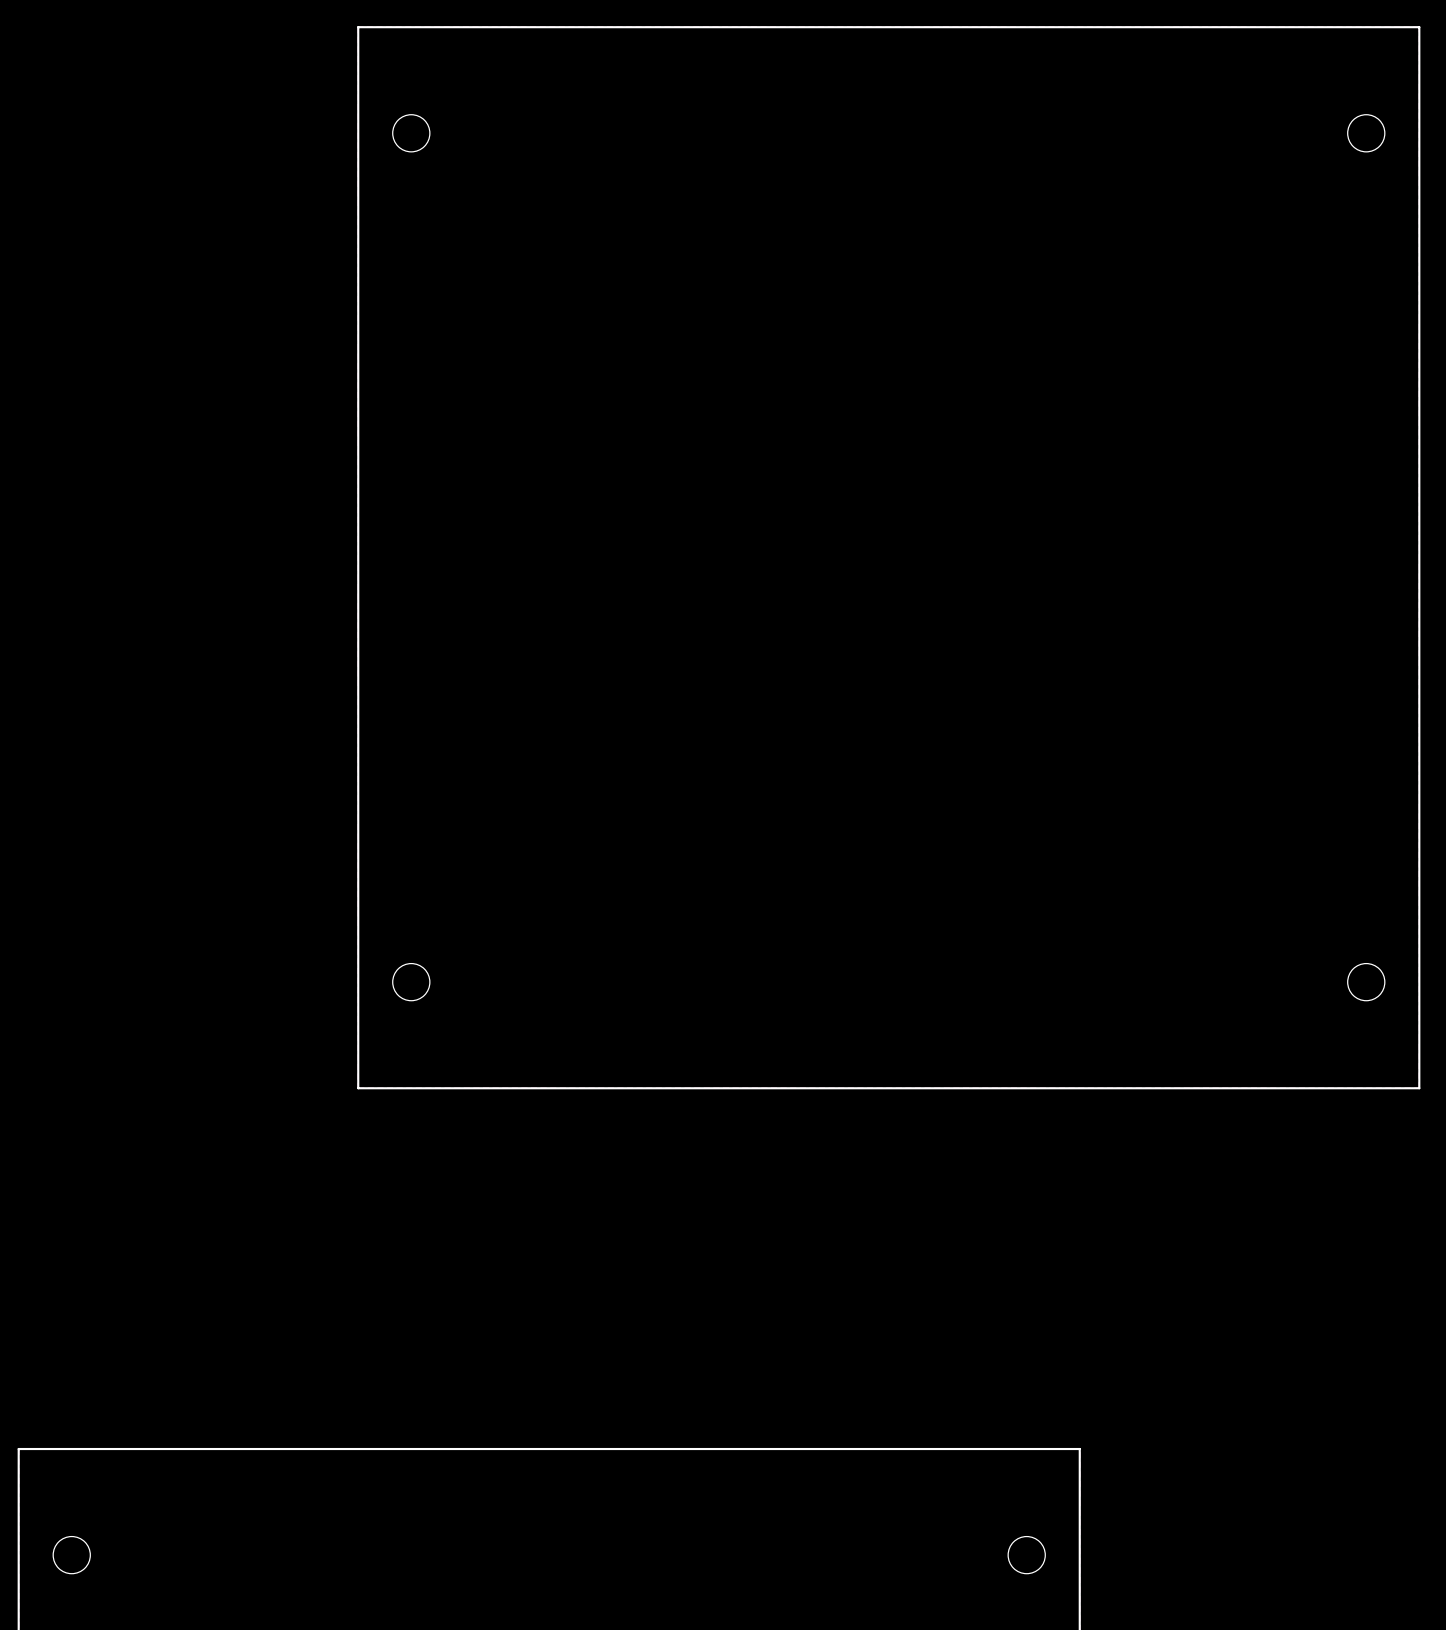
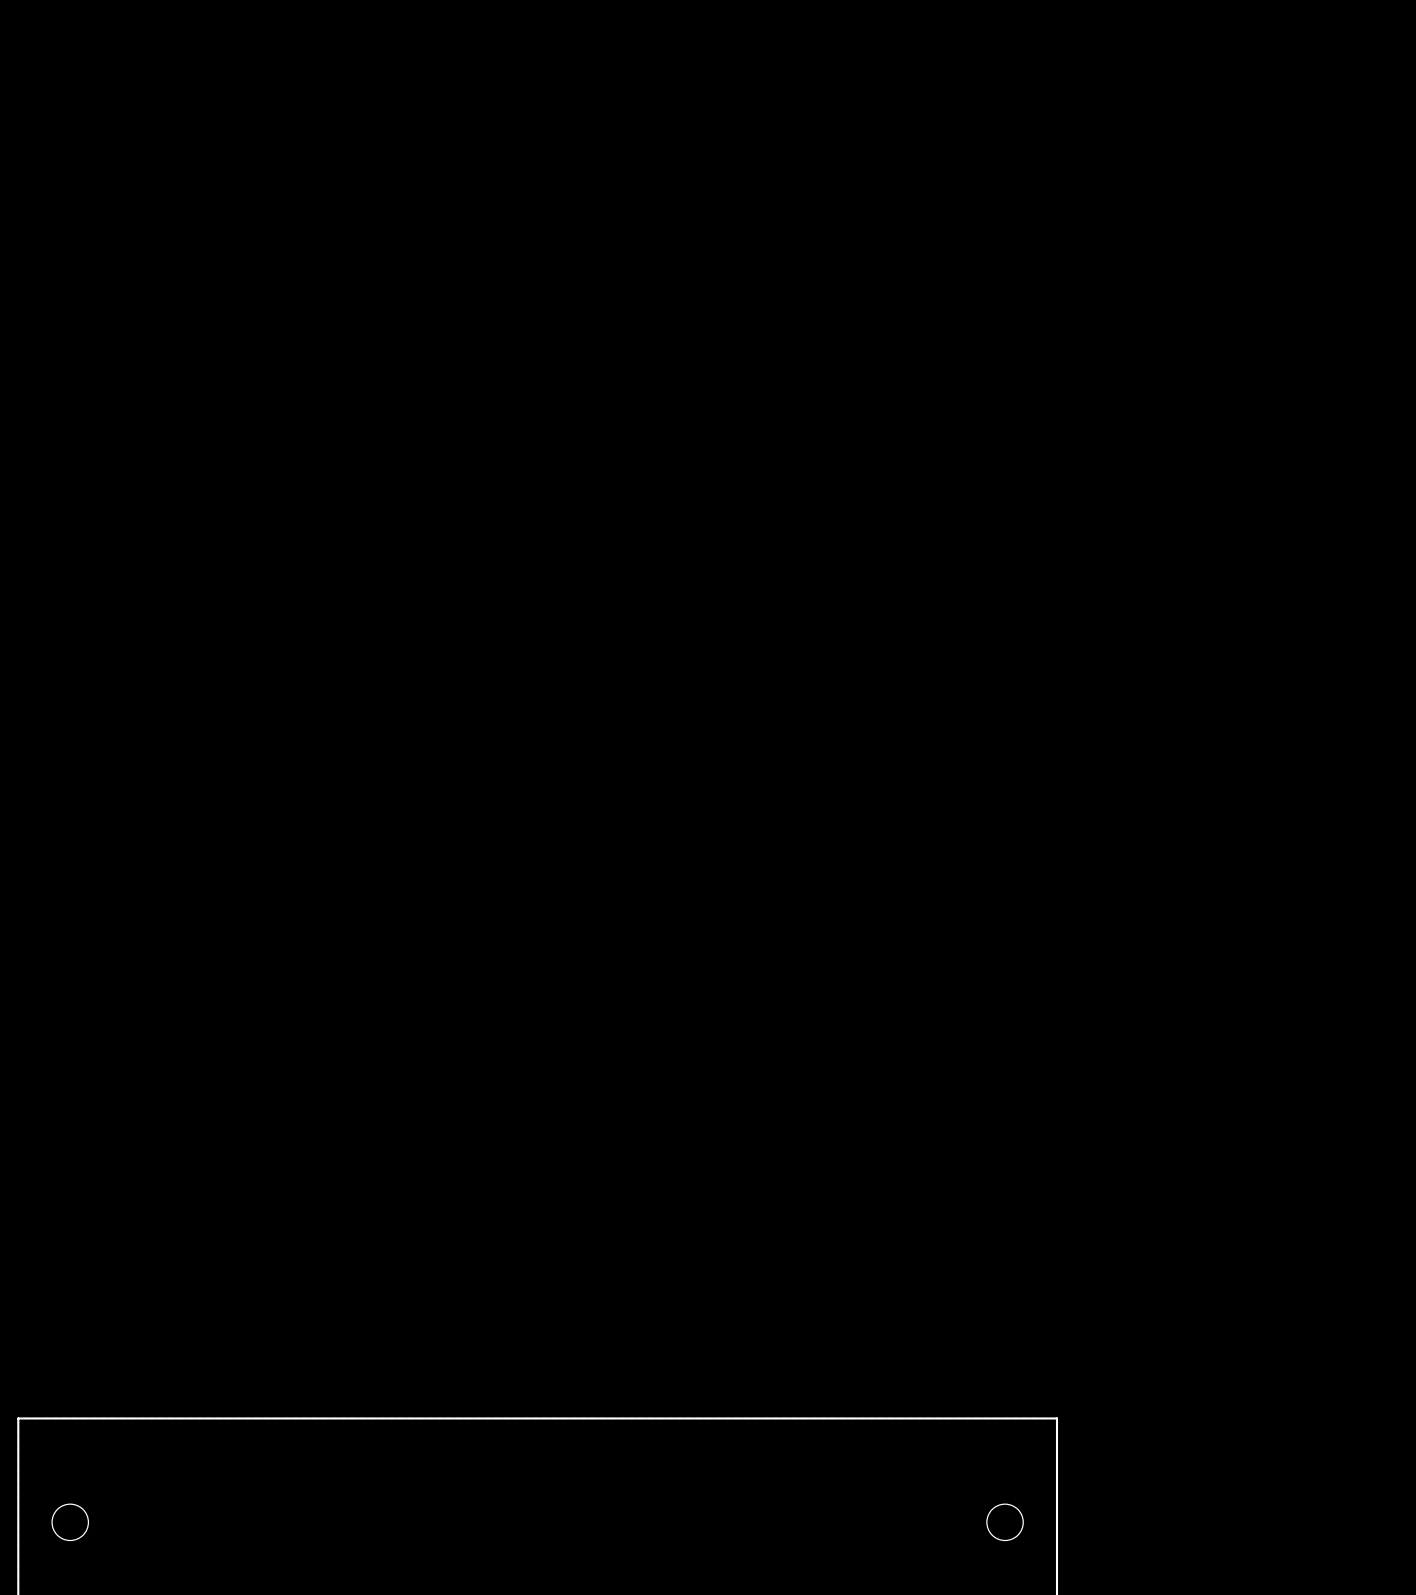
board edge: (358, 27) (1419, 27) (1419, 1088) (358, 1088) (358, 27) -> none
round board edge: [392, 114, 431, 153] -> none
round board edge: [1347, 114, 1386, 153] -> none
round board edge: [392, 963, 431, 1001] -> none
round board edge: [1347, 963, 1386, 1001] -> none

